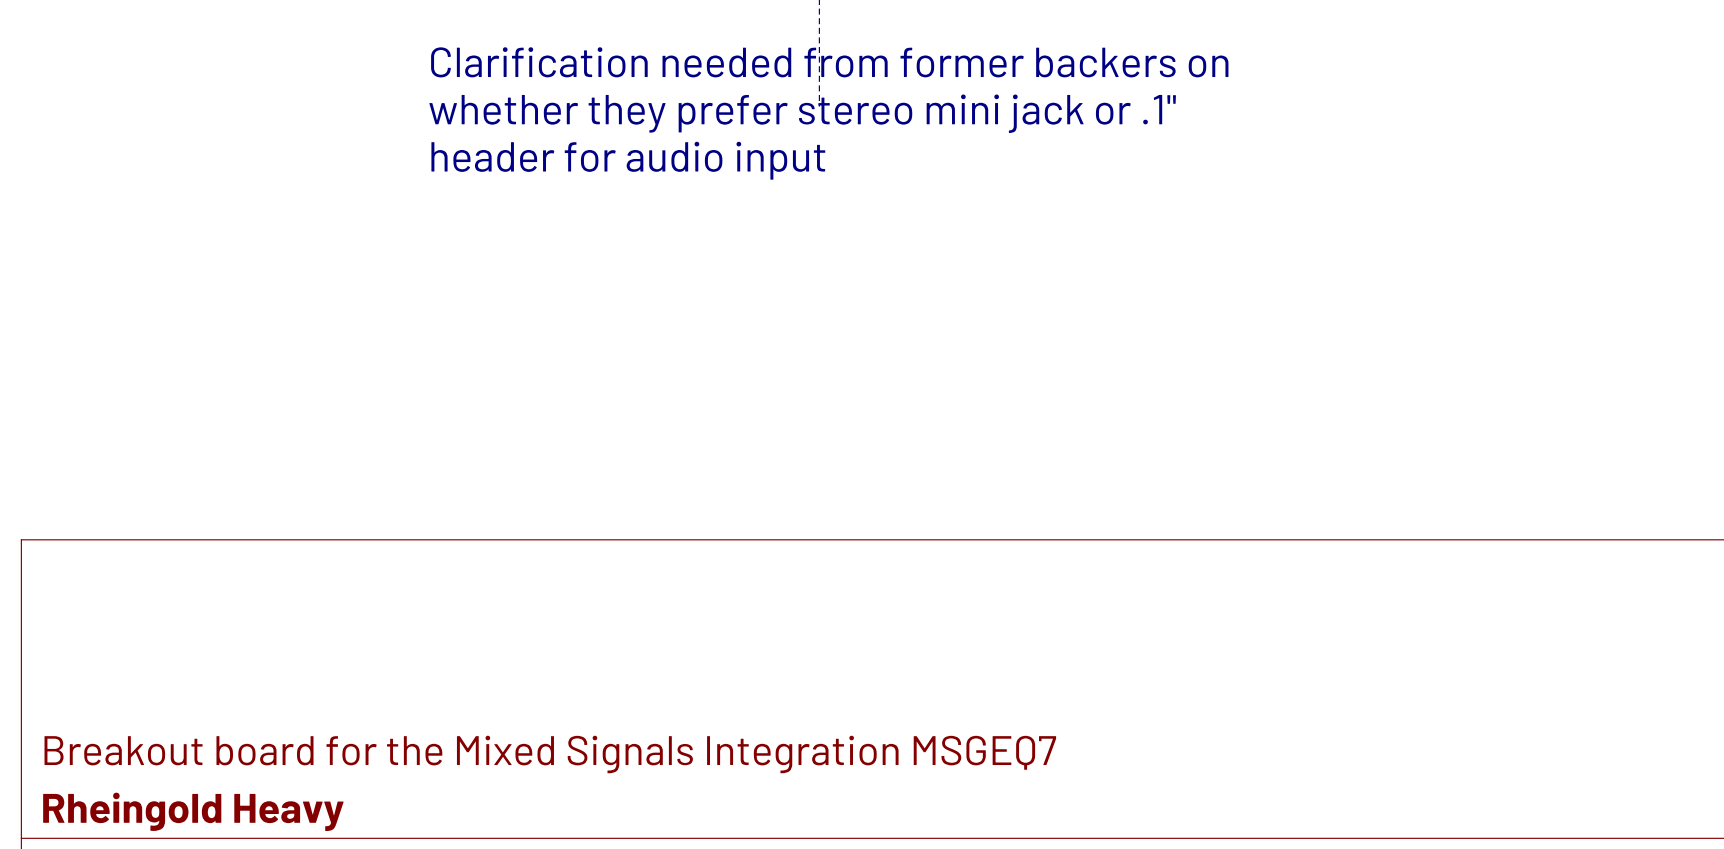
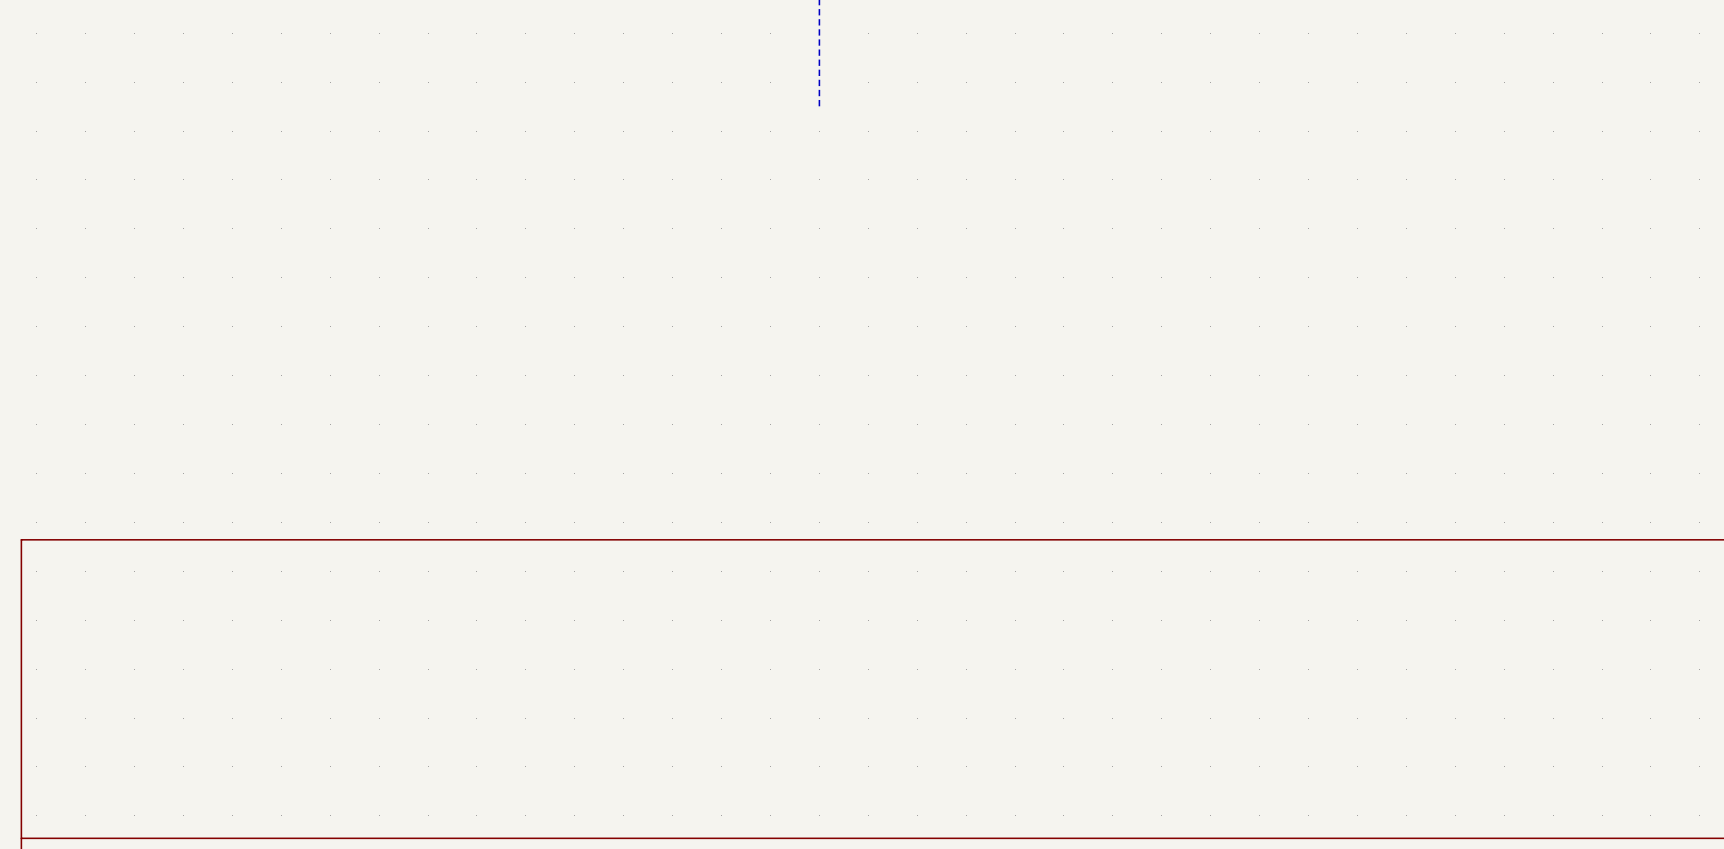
text: Clarification needed from former backers on (829, 62) -> none
text: whether they prefer stereo mini jack or .1" (802, 113) -> none
text: header for audio input (628, 160) -> none
title block: Breakout board for the Mixed Signals Integration MSGEQ7 (550, 754) -> none
title block: Rheingold Heavy (193, 811) -> none

